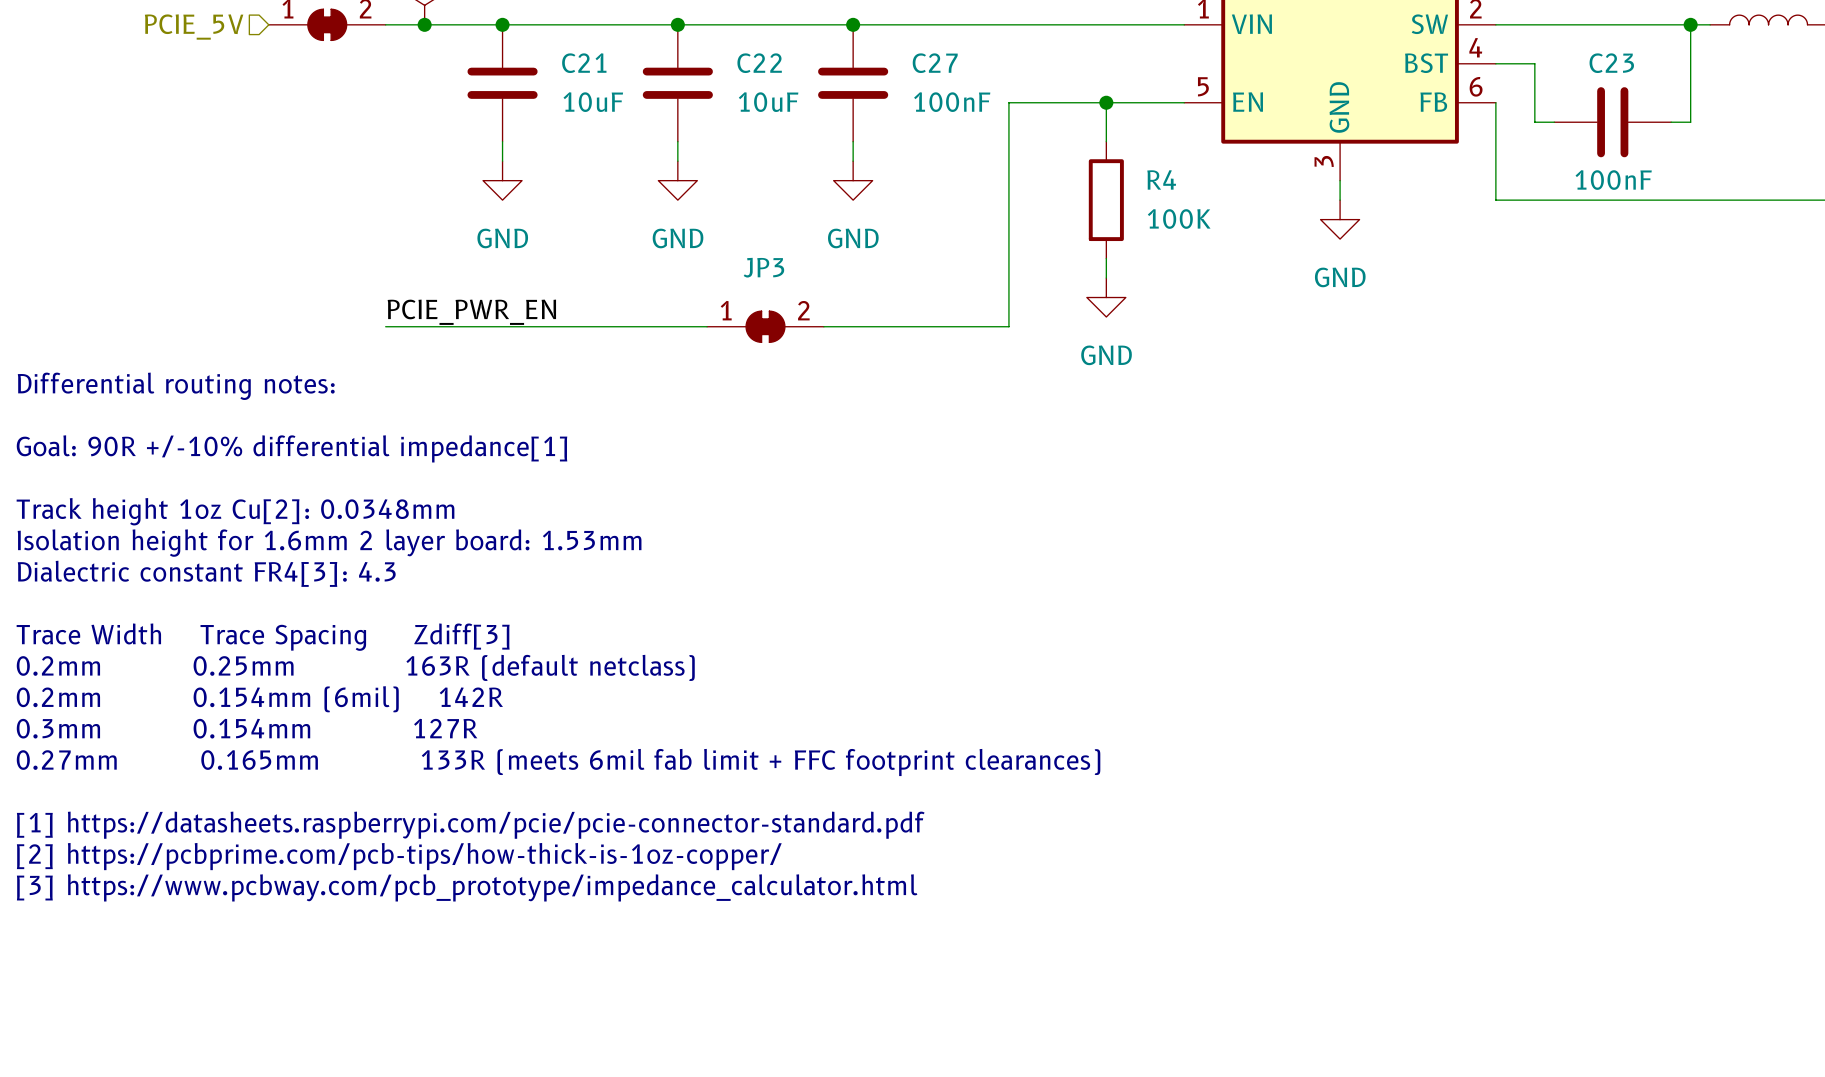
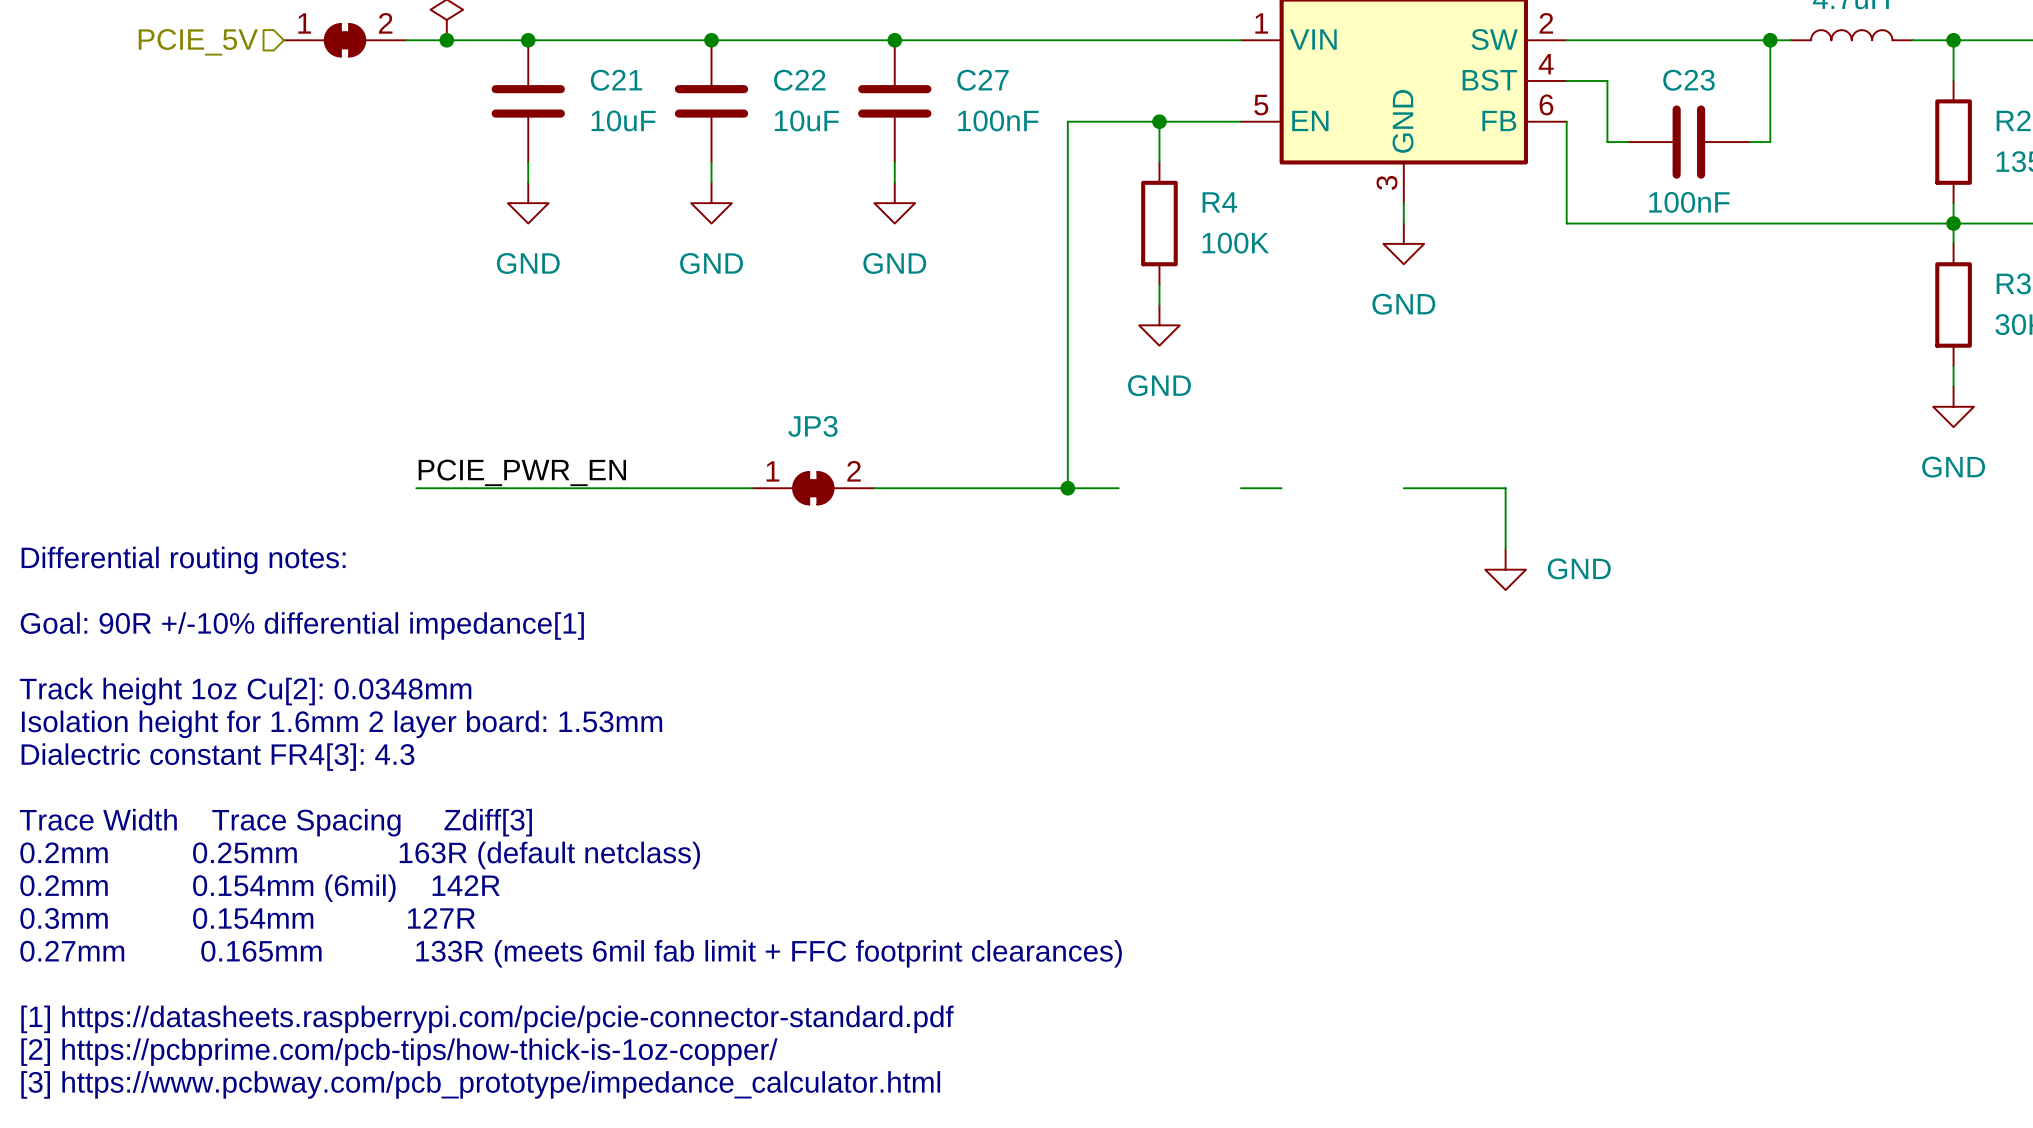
wire: (1018, 102) (1008, 102) (1008, 326) (823, 326) -> (1067, 121) (1067, 488)
label position: PCIE_PWR_EN (471, 312) -> PCIE_PWR_EN (522, 472)
wire: (385, 326) (707, 326) -> (416, 488) (752, 488)
JP3 position: (765, 326) -> (813, 488)
text position: Differential routing notes: (176, 386) -> Differential routing notes: (183, 560)
text position: Goal: 90R +/-10% differential impedance[1] (292, 448) -> Goal: 90R +/-10% differential impedance[1] (302, 625)
wire: none -> (874, 488) (1118, 488)
junction: none -> (1067, 488)
wire: none -> (1240, 488) (1281, 488)
wire: none -> (1403, 488) (1505, 488) (1505, 549)
text position: Track height 1oz Cu[2]: 0.0348mm (235, 511) -> Track height 1oz Cu[2]: 0.0348mm (245, 691)
power symbol: none -> GND (1505, 569)
text position: Isolation height for 1.6mm 2 layer board: 1.53mm (329, 543) -> Isolation height for 1.6mm 2 layer board: 1.53mm (342, 724)
text position: Dialectric constant FR4[3]: 4.3 (206, 573) -> Dialectric constant FR4[3]: 4.3 (217, 757)
text position: Trace Width Trace Spacing Zdiff[3] (263, 637) -> Trace Width Trace Spacing Zdiff[3] (275, 822)
text position: 0.2mm 0.25mm 163R (default netclass) (355, 667) -> 0.2mm 0.25mm 163R (default netclass) (360, 855)
text position: 0.2mm 0.154mm (6mil) 142R (259, 699) -> 0.2mm 0.154mm (6mil) 142R (260, 888)
text position: 0.3mm 0.154mm 127R (247, 728) -> 0.3mm 0.154mm 127R (247, 918)
text position: 0.27mm 0.165mm 133R (meets 6mil fab limit + FFC footprint clearances) (558, 762) -> 0.27mm 0.165mm 133R (meets 6mil fab limit + FFC footprint clearances) (571, 953)
text position: [1] https://datasheets.raspberrypi.com/pcie/pcie-connector-standard.pdf (470, 825) -> [1] https://datasheets.raspberrypi.com/pcie/pcie-connector-standard.pdf (487, 1019)
text position: [2] https://pcbprime.com/pcb-tips/how-thick-is-1oz-copper/ (399, 856) -> [2] https://pcbprime.com/pcb-tips/how-thick-is-1oz-copper/ (399, 1052)
text position: [3] https://www.pcbway.com/pcb_prototype/impedance_calculator.html (467, 887) -> [3] https://www.pcbway.com/pcb_prototype/impedance_calculator.html (480, 1084)

